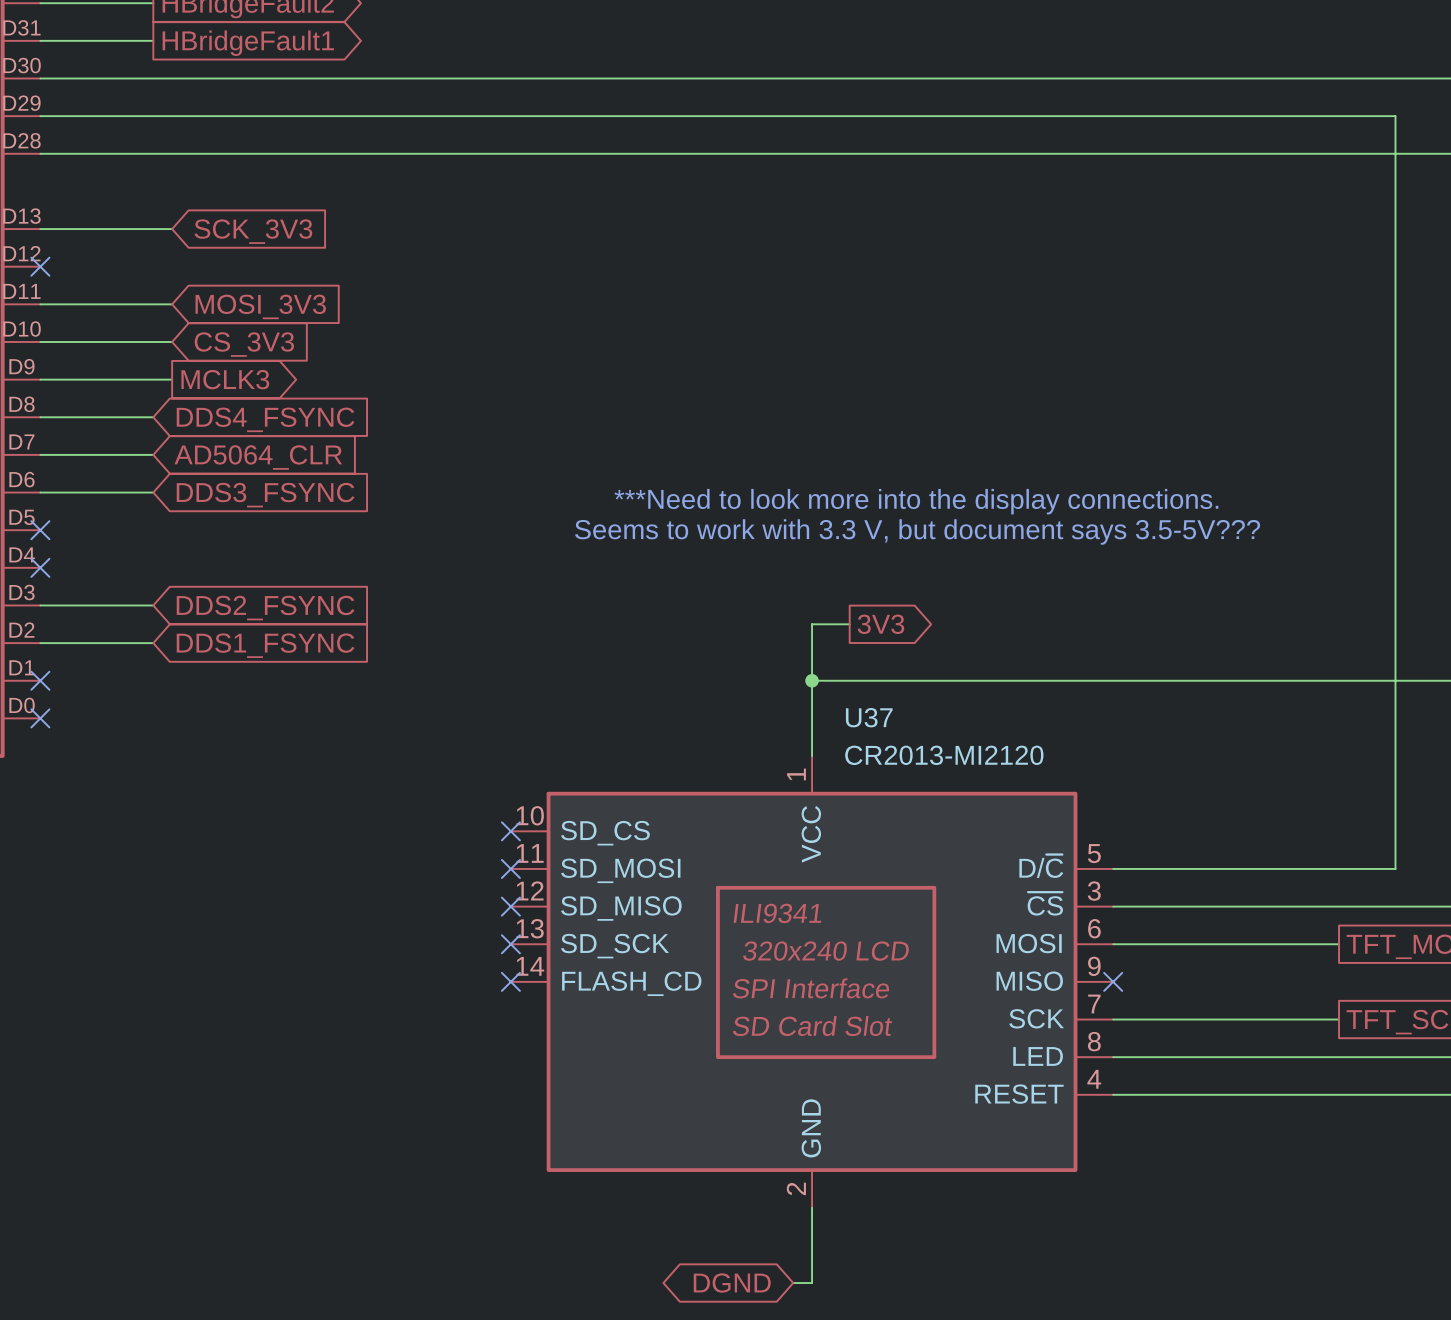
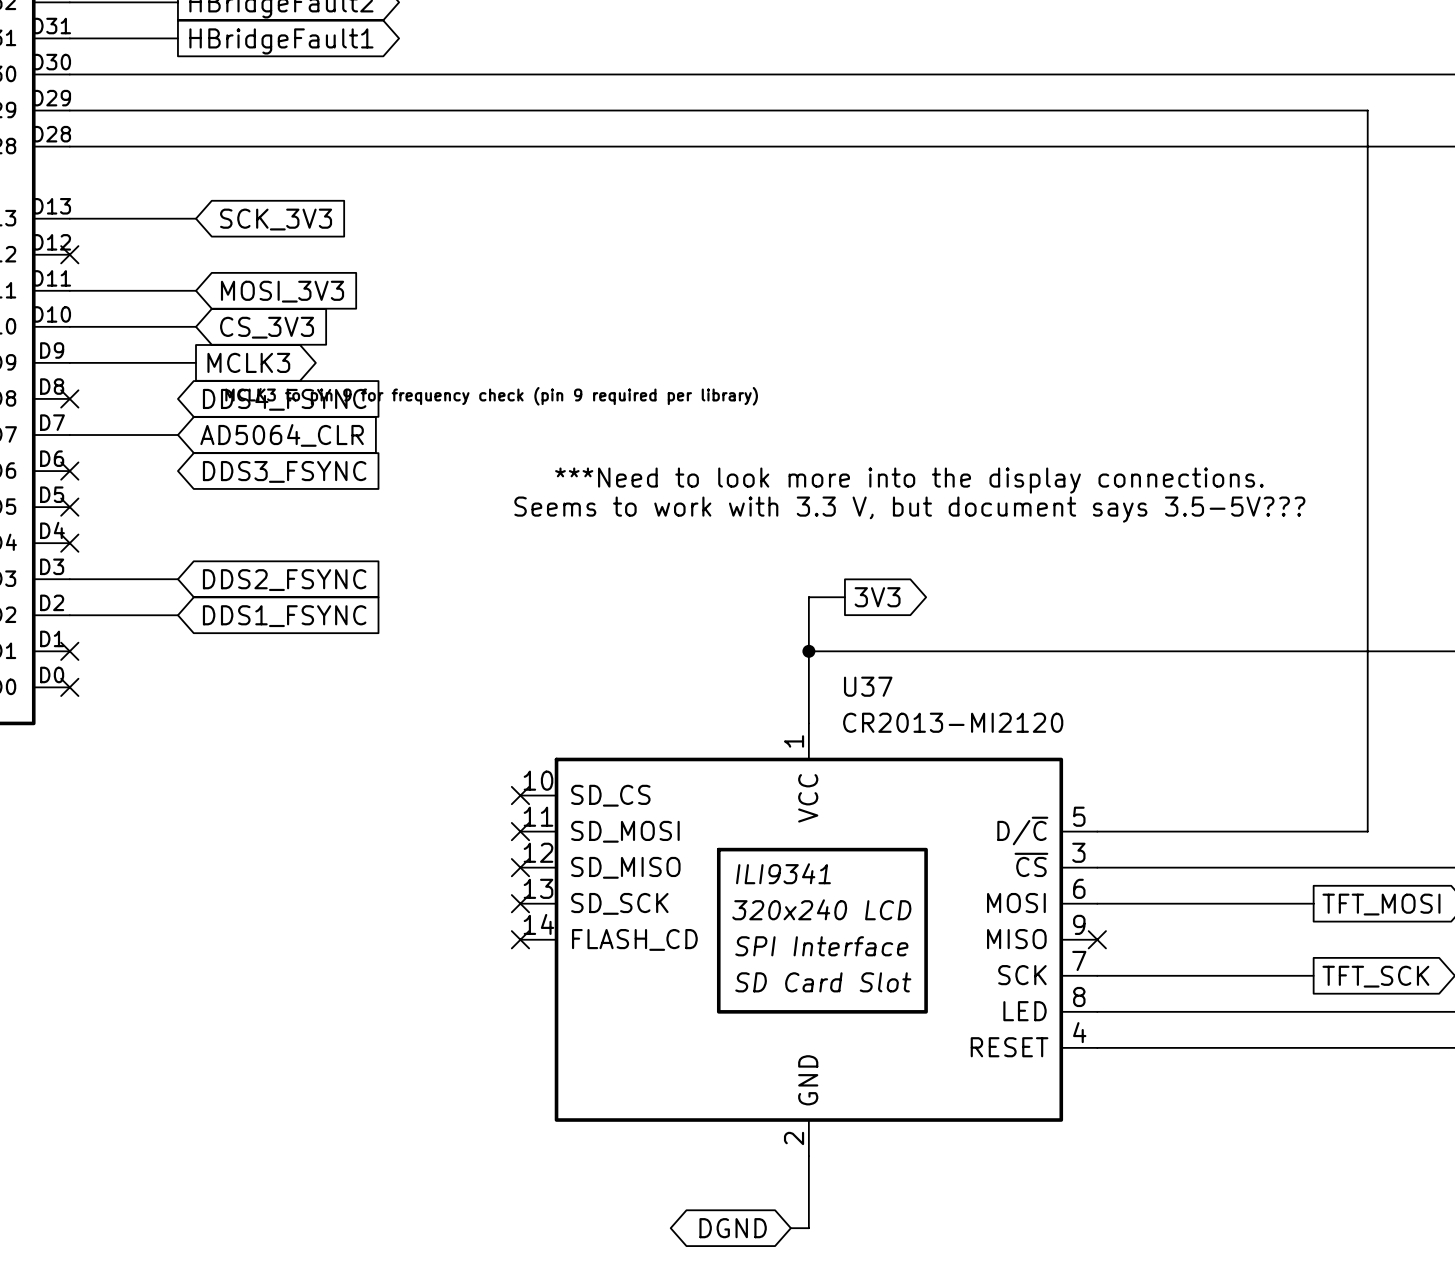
text: none -> MCLK3 to pin 9 for frequency check (pin 9 required per library) (491, 396)
wire: (40, 417) (153, 417) -> none
no-connect mark: none -> (69, 398)
wire: (40, 492) (153, 492) -> none
no-connect mark: none -> (69, 471)

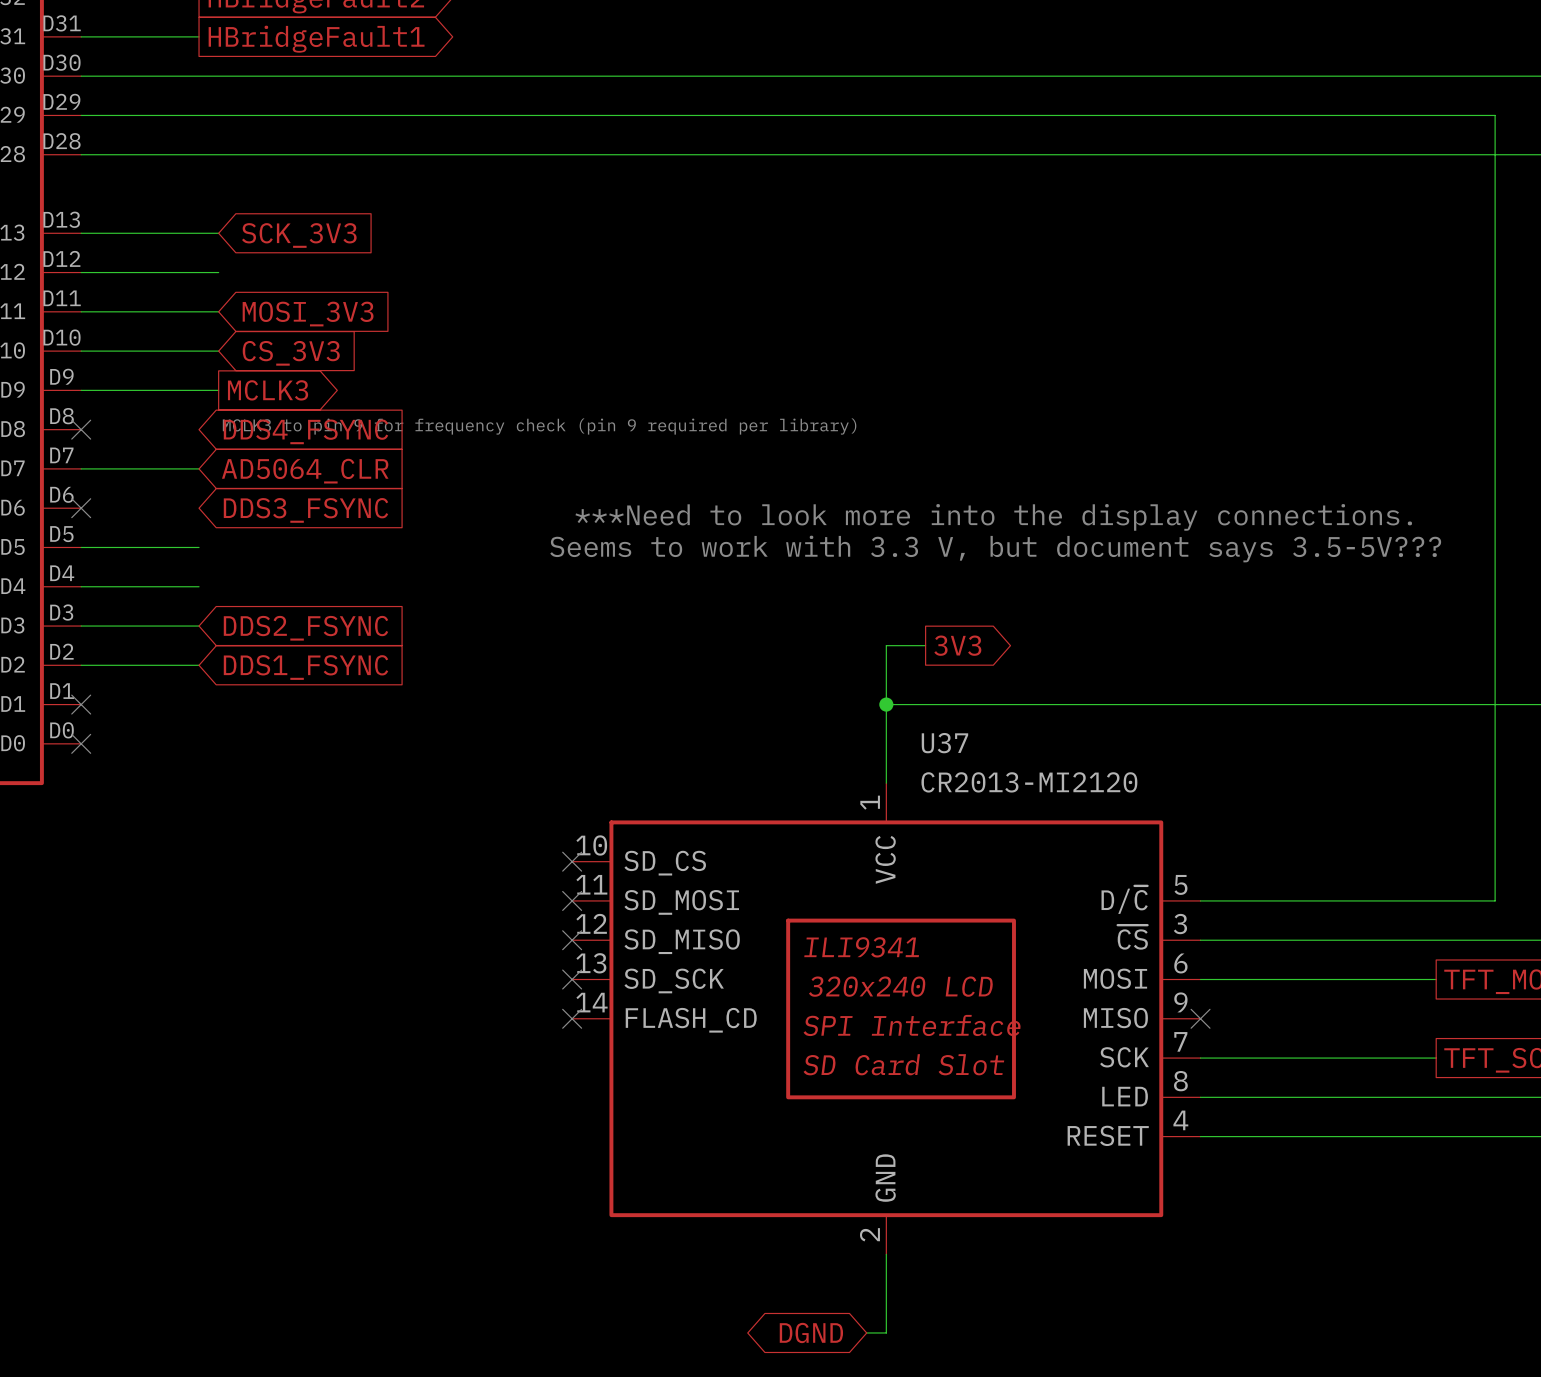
wire: none -> (81, 272) (218, 272)
no-connect mark: (69, 254) -> none
wire: none -> (81, 547) (199, 547)
no-connect mark: (69, 507) -> none
wire: none -> (81, 586) (199, 586)
no-connect mark: (69, 543) -> none

